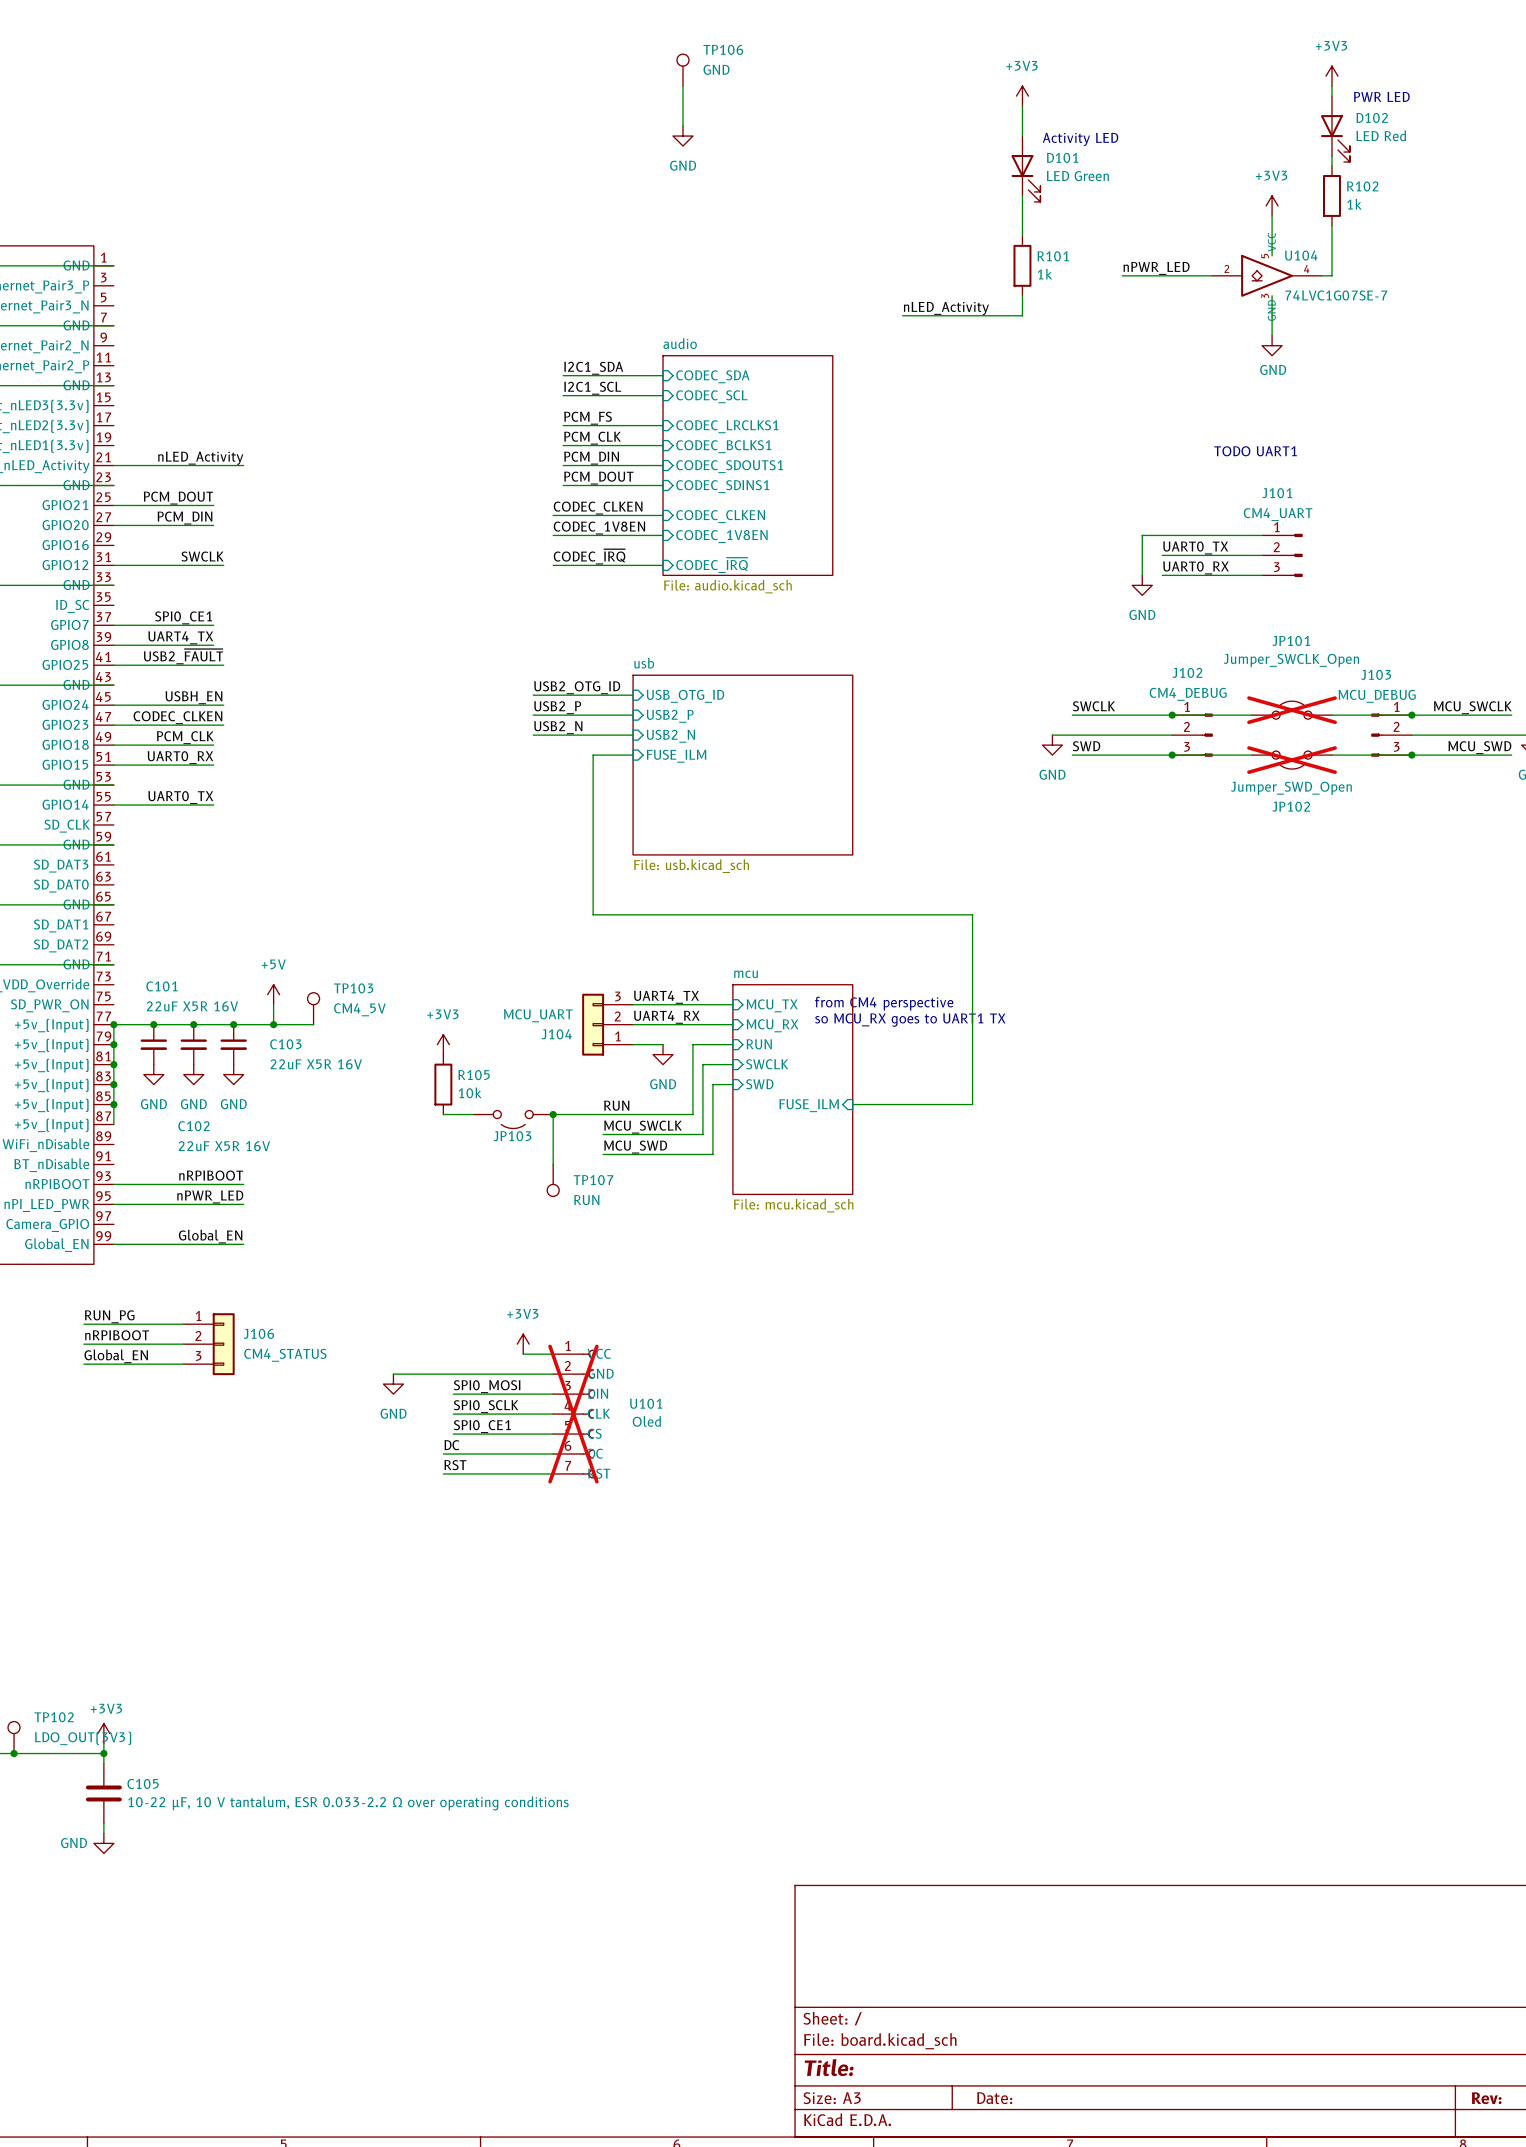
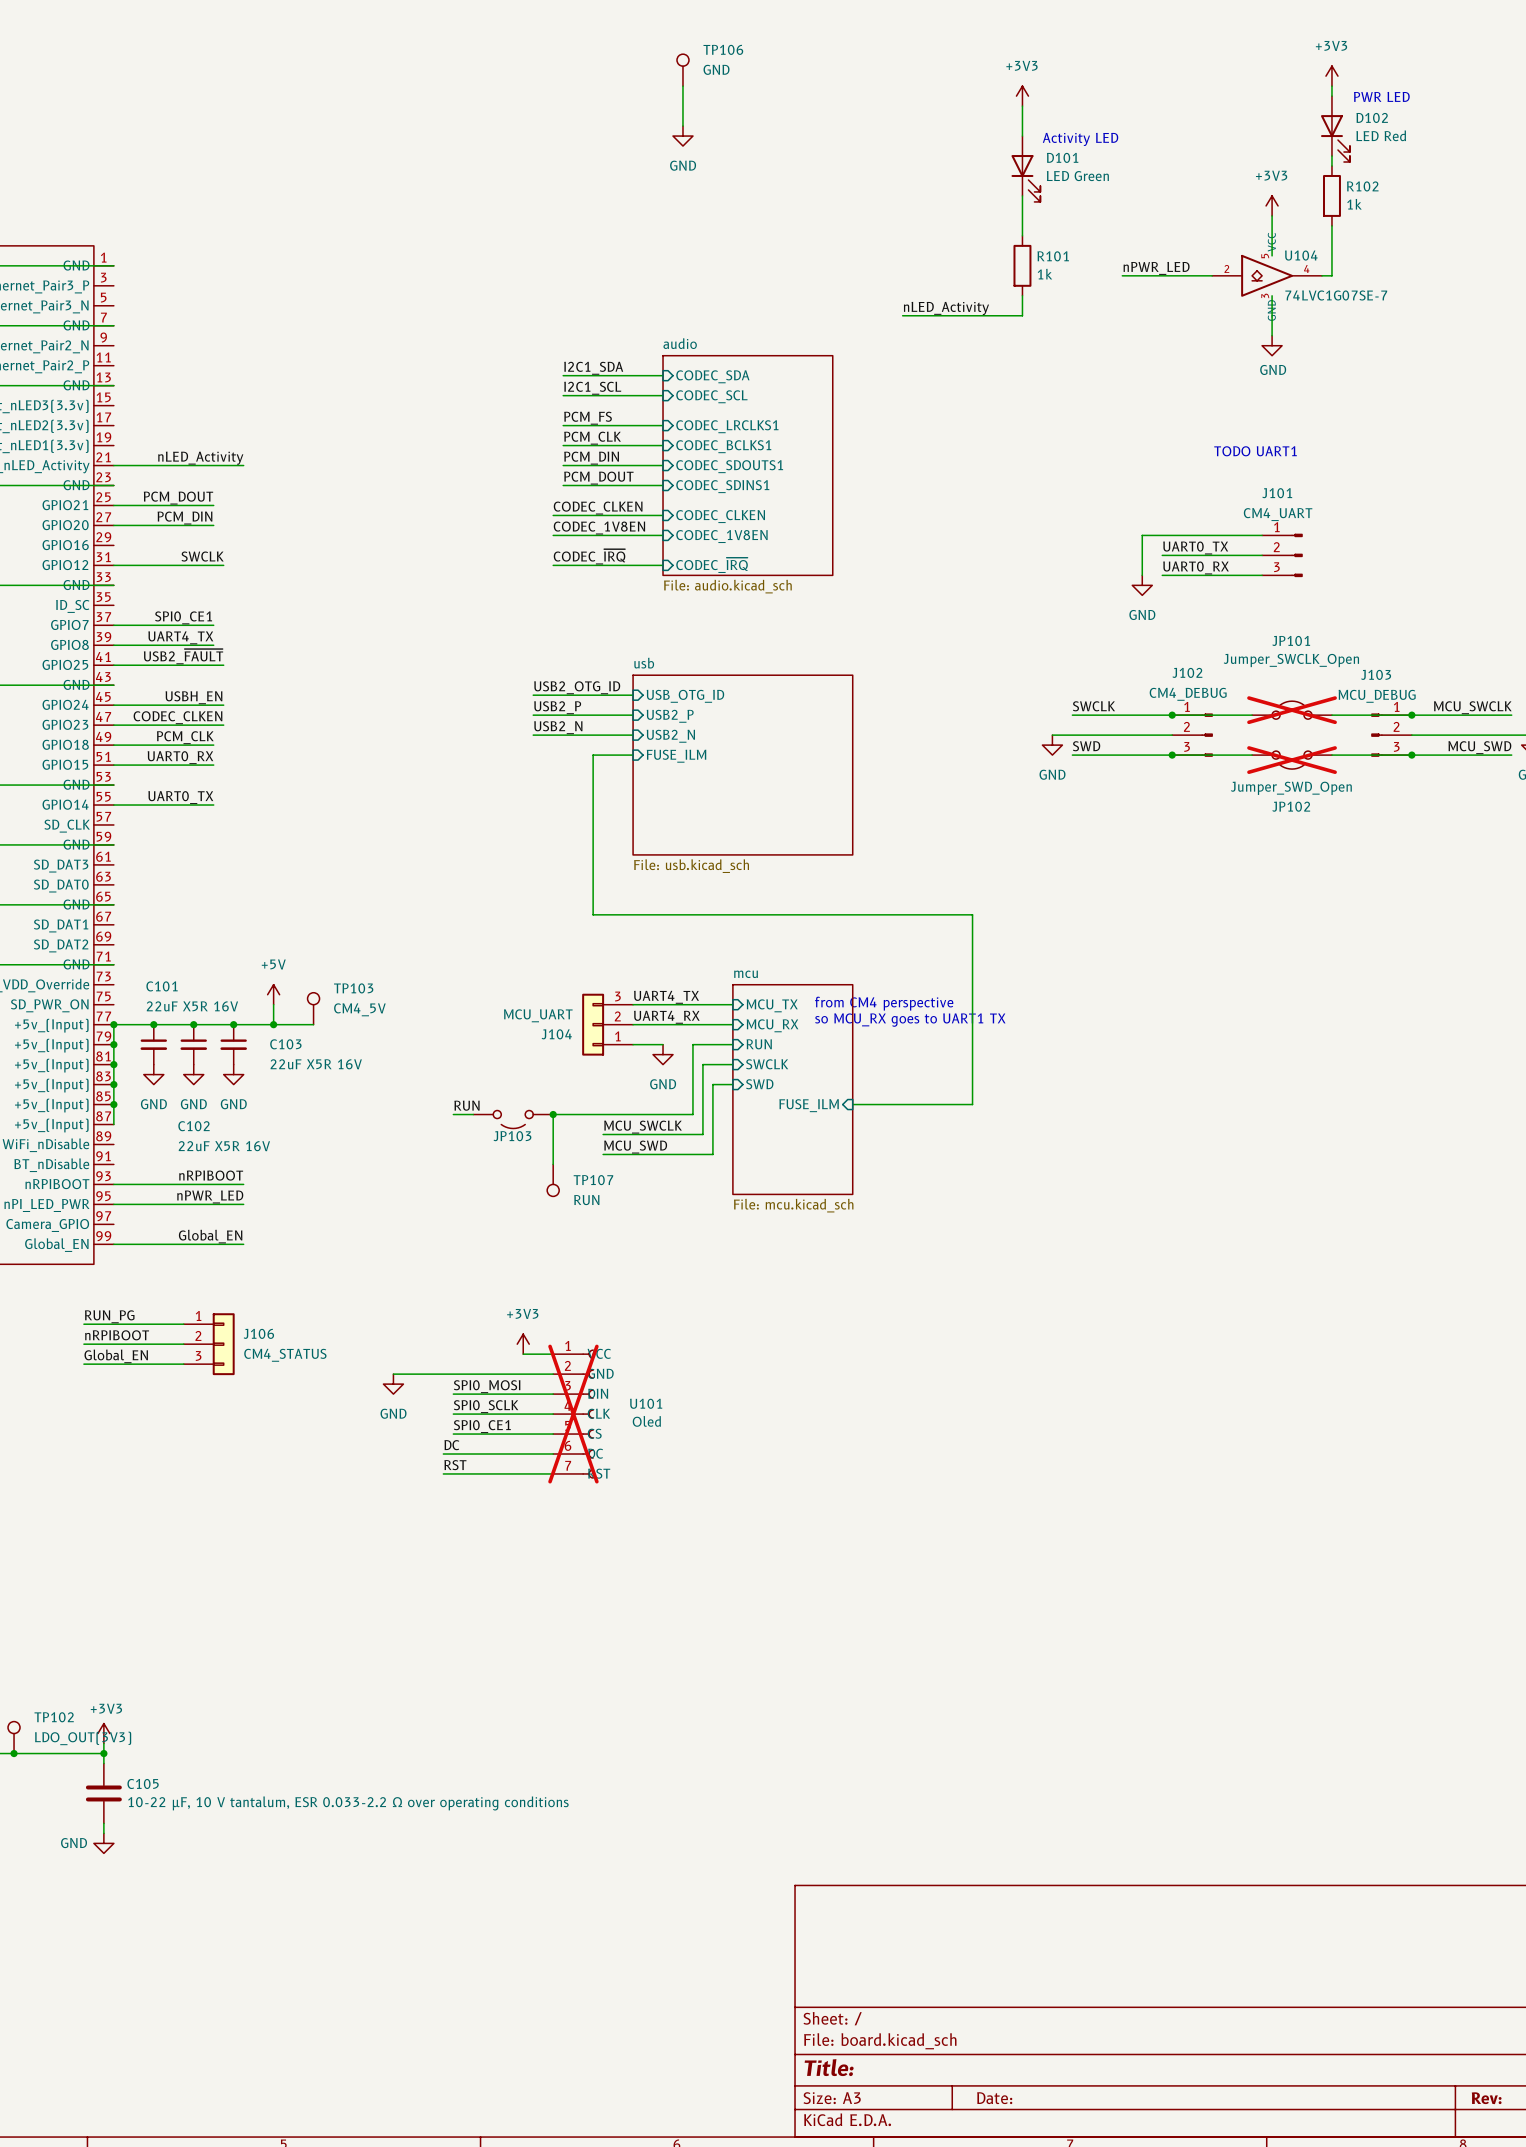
power symbol: +3V3 (443, 1044) -> none
R105: 10k (443, 1084) -> none
label position: RUN (616, 1105) -> RUN (466, 1105)
wire: (443, 1114) (453, 1114) -> none

